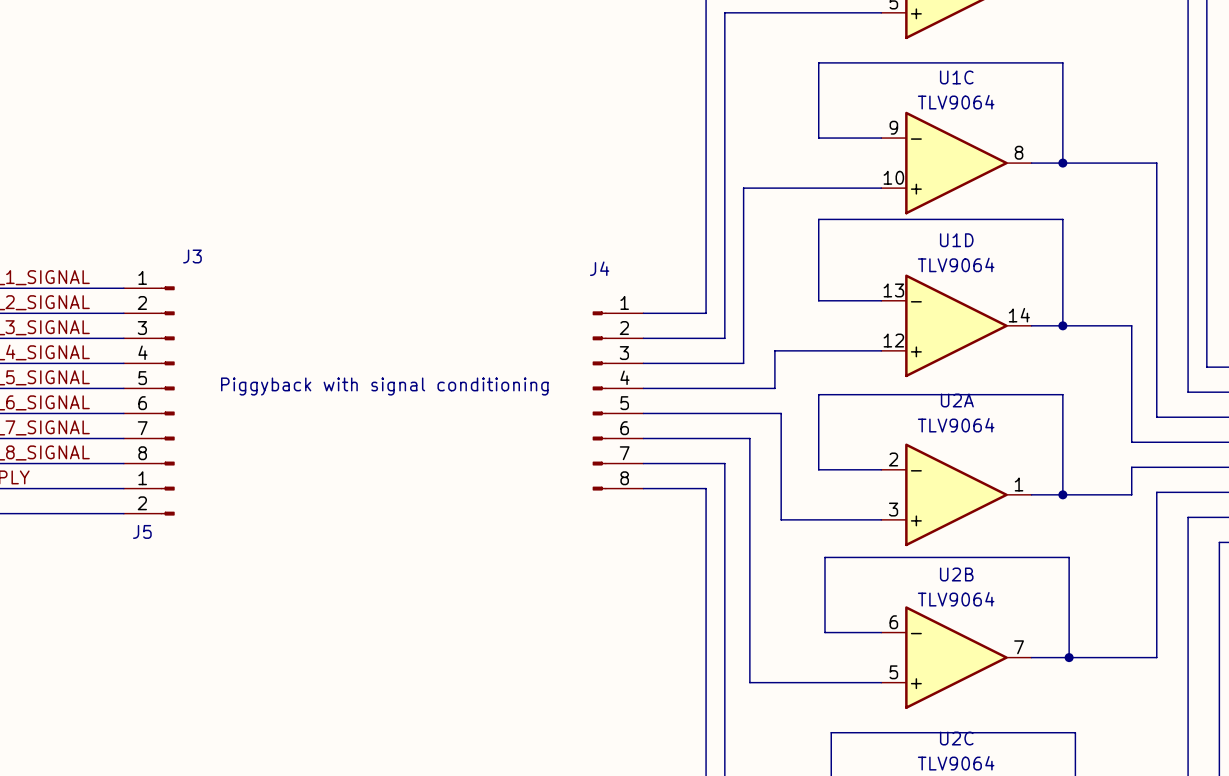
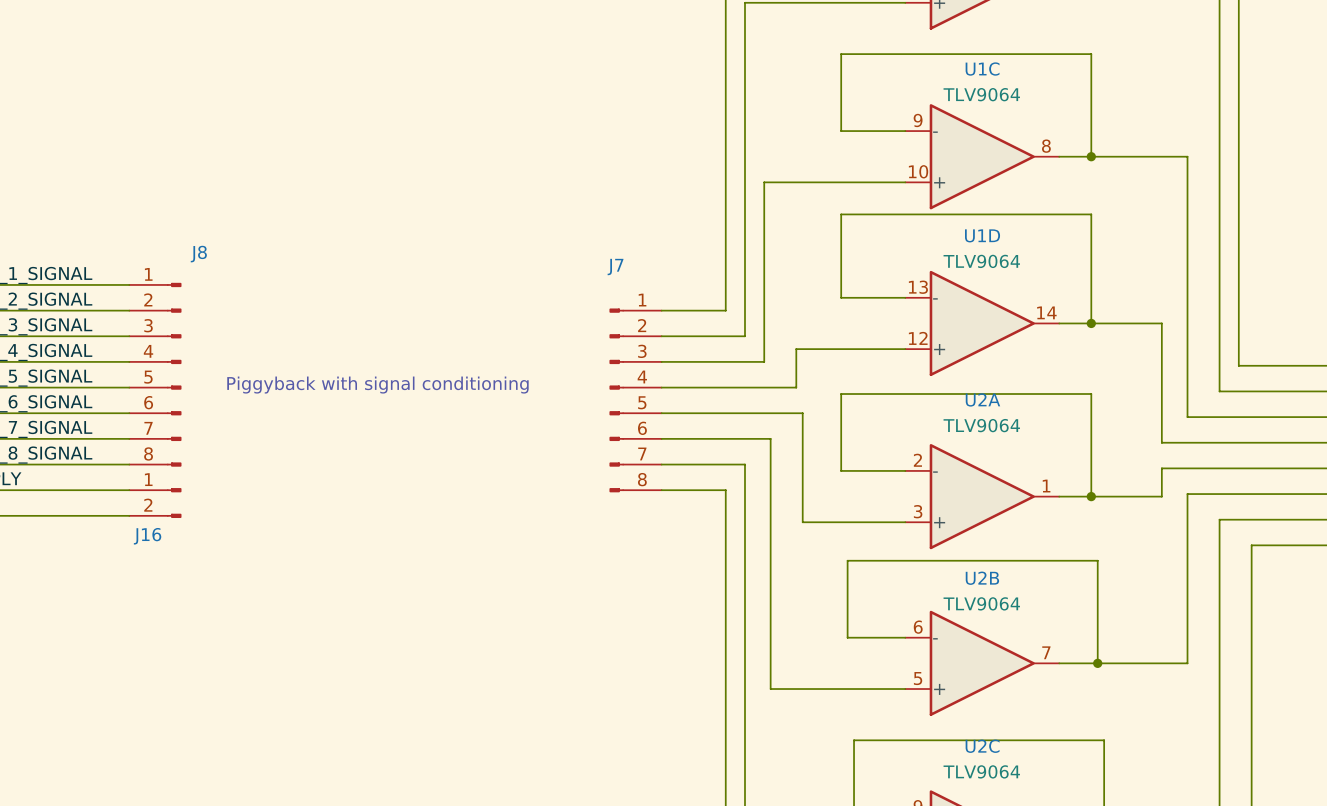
J3 name: J3 (192, 256) -> J8 (198, 254)
J4 name: J4 (599, 268) -> J7 (615, 267)
J5 name: J5 (142, 531) -> J16 (147, 536)

